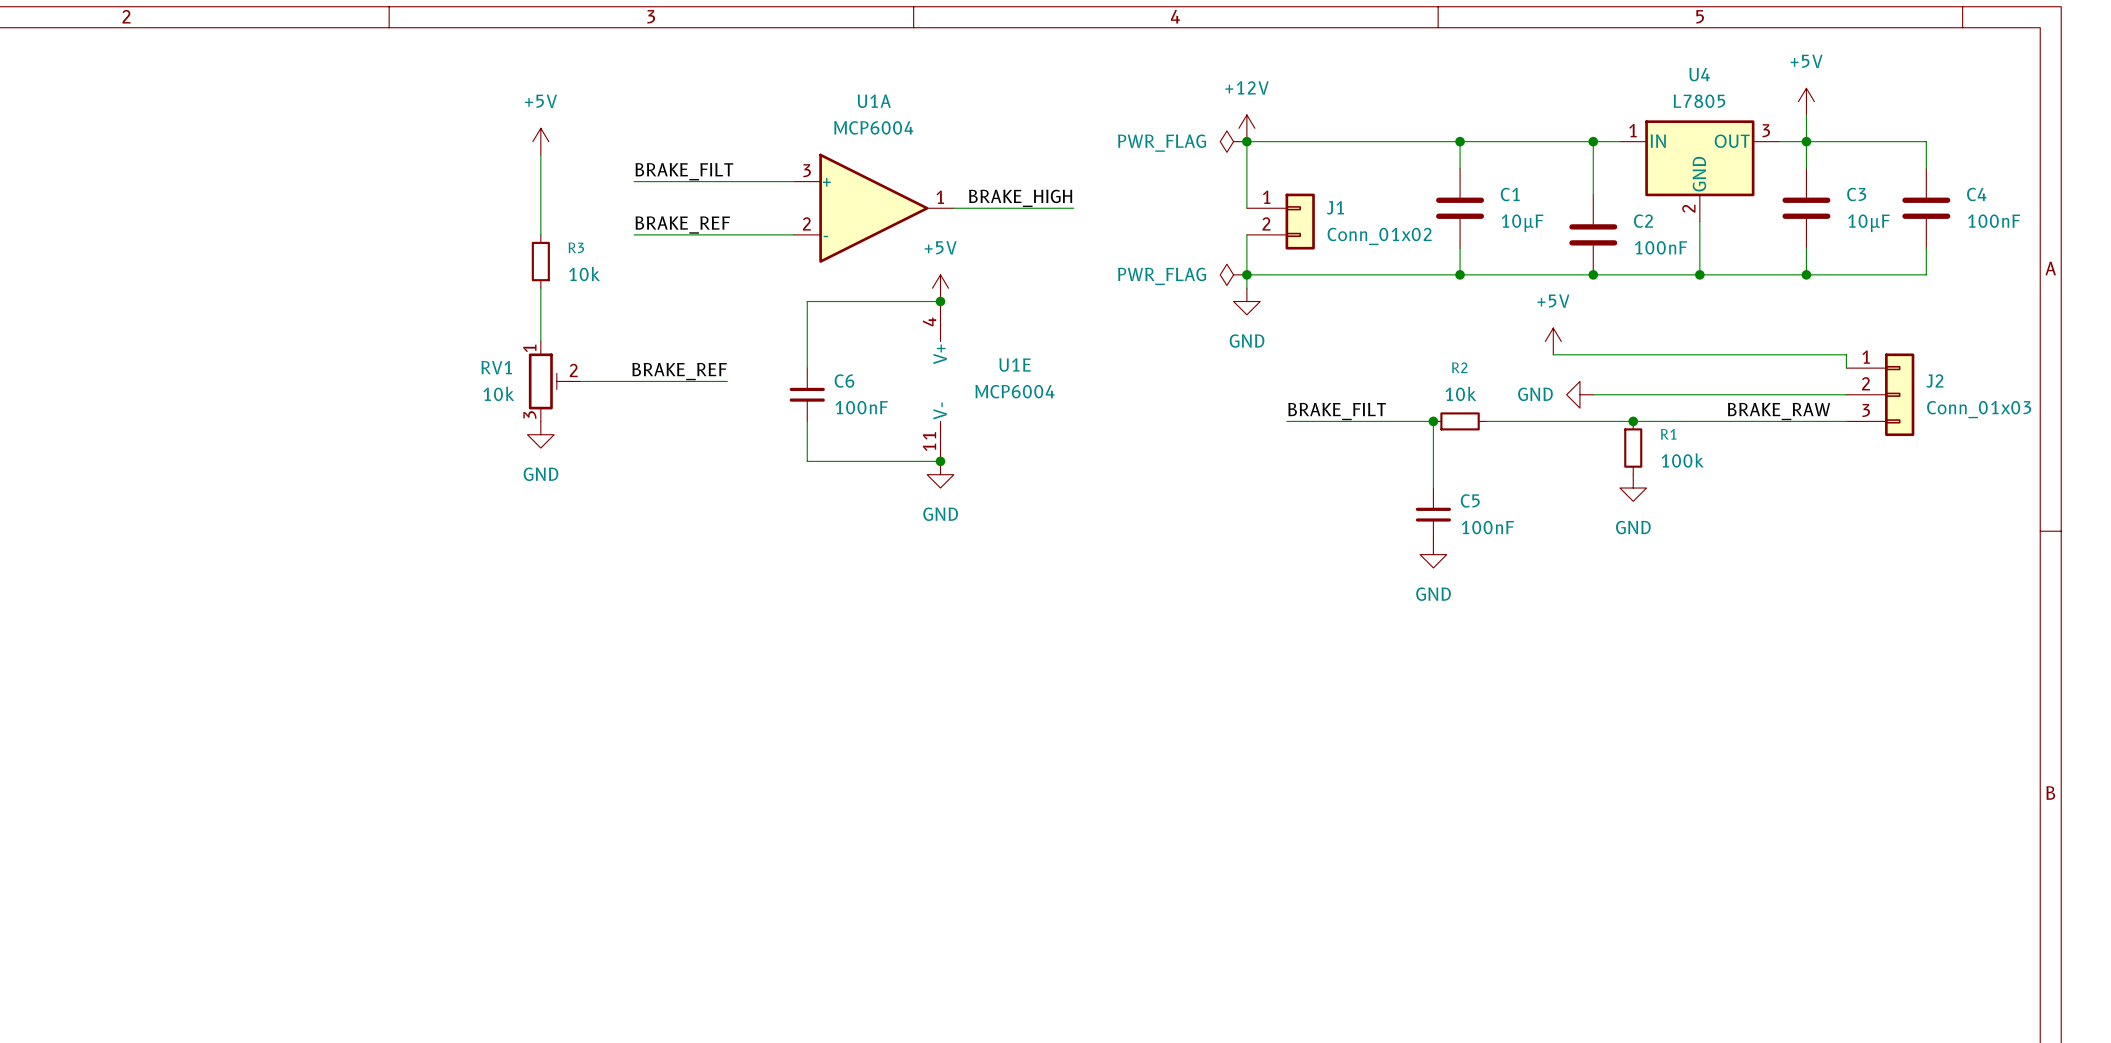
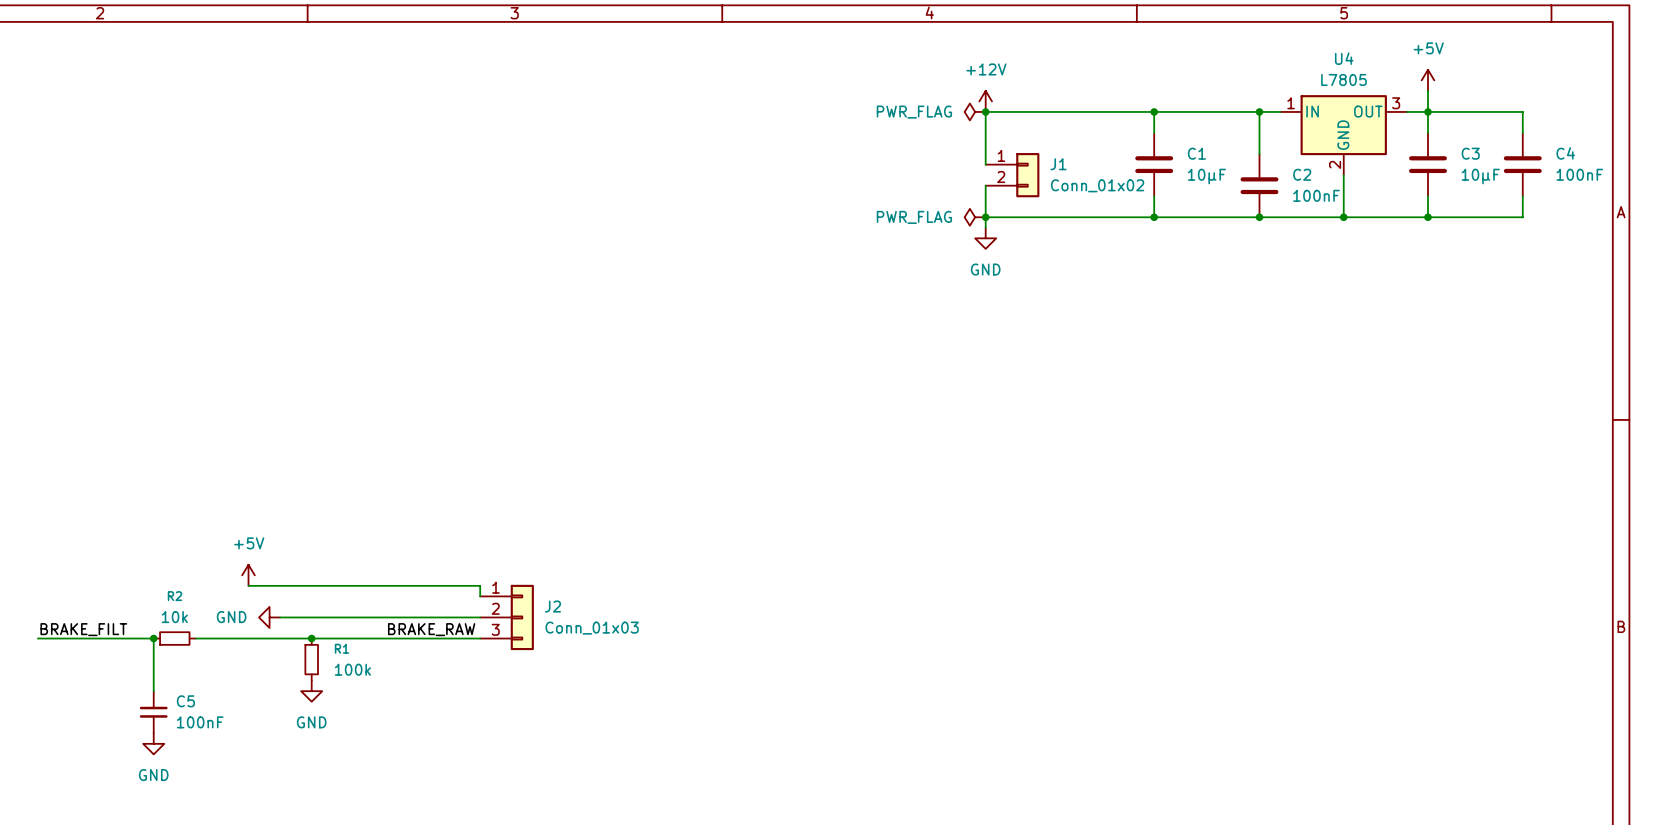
power symbol: +5V (540, 141) -> none
wire: (540, 154) (540, 234) -> none
label: BRAKE_FILT (684, 171) -> none
wire: (634, 181) (793, 181) -> none
label: BRAKE_HIGH (1020, 198) -> none
U1A: MCP6004 (873, 208) -> none
wire: (953, 208) (1073, 208) -> none
label: BRAKE_REF (682, 225) -> none
wire: (634, 234) (793, 234) -> none
R3: 10k (540, 261) -> none
wire: (540, 288) (540, 341) -> none
power symbol: +5V (940, 288) -> none
wire: (940, 301) (807, 301) (807, 368) -> none
junction: (940, 301) -> none
power symbol: +5V (1553, 341) -> none
wire: (1553, 354) (1846, 354) (1846, 368) -> none
label: BRAKE_REF (679, 371) -> none
RV1: 10k (554, 381) -> none
wire: (580, 381) (727, 381) -> none
U1E: MCP6004 (940, 381) -> none
C6: 100nF (807, 394) -> none
power symbol: GND (1579, 394) -> none
wire: (1593, 394) (1846, 394) -> none
J2 position: (1880, 394) -> (507, 617)
label: BRAKE_FILT (1337, 411) -> none
label: BRAKE_RAW (1778, 411) -> none
wire: (807, 421) (807, 461) (940, 461) -> none
wire: (1286, 421) (1433, 421) (1433, 488) -> none
junction: (1433, 421) -> none
R2 position: (1460, 421) -> (174, 638)
wire: (1486, 421) (1846, 421) -> none
junction: (1633, 421) -> none
power symbol: GND (540, 434) -> none
R1 position: (1633, 448) -> (311, 659)
junction: (940, 461) -> none
power symbol: GND (940, 474) -> none
power symbol: GND (1633, 488) -> none
C5 position: (1433, 514) -> (153, 712)
power symbol: GND (1433, 554) -> none
power symbol: none -> +5V (248, 575)
wire: none -> (248, 585) (480, 585) (480, 596)
power symbol: none -> GND (269, 617)
wire: none -> (280, 617) (480, 617)
label: none -> BRAKE_FILT (83, 629)
label: none -> BRAKE_RAW (431, 629)
wire: none -> (37, 638) (153, 638) (153, 691)
junction: none -> (153, 638)
wire: none -> (195, 638) (480, 638)
junction: none -> (311, 638)
power symbol: none -> GND (311, 691)
power symbol: none -> GND (153, 743)

